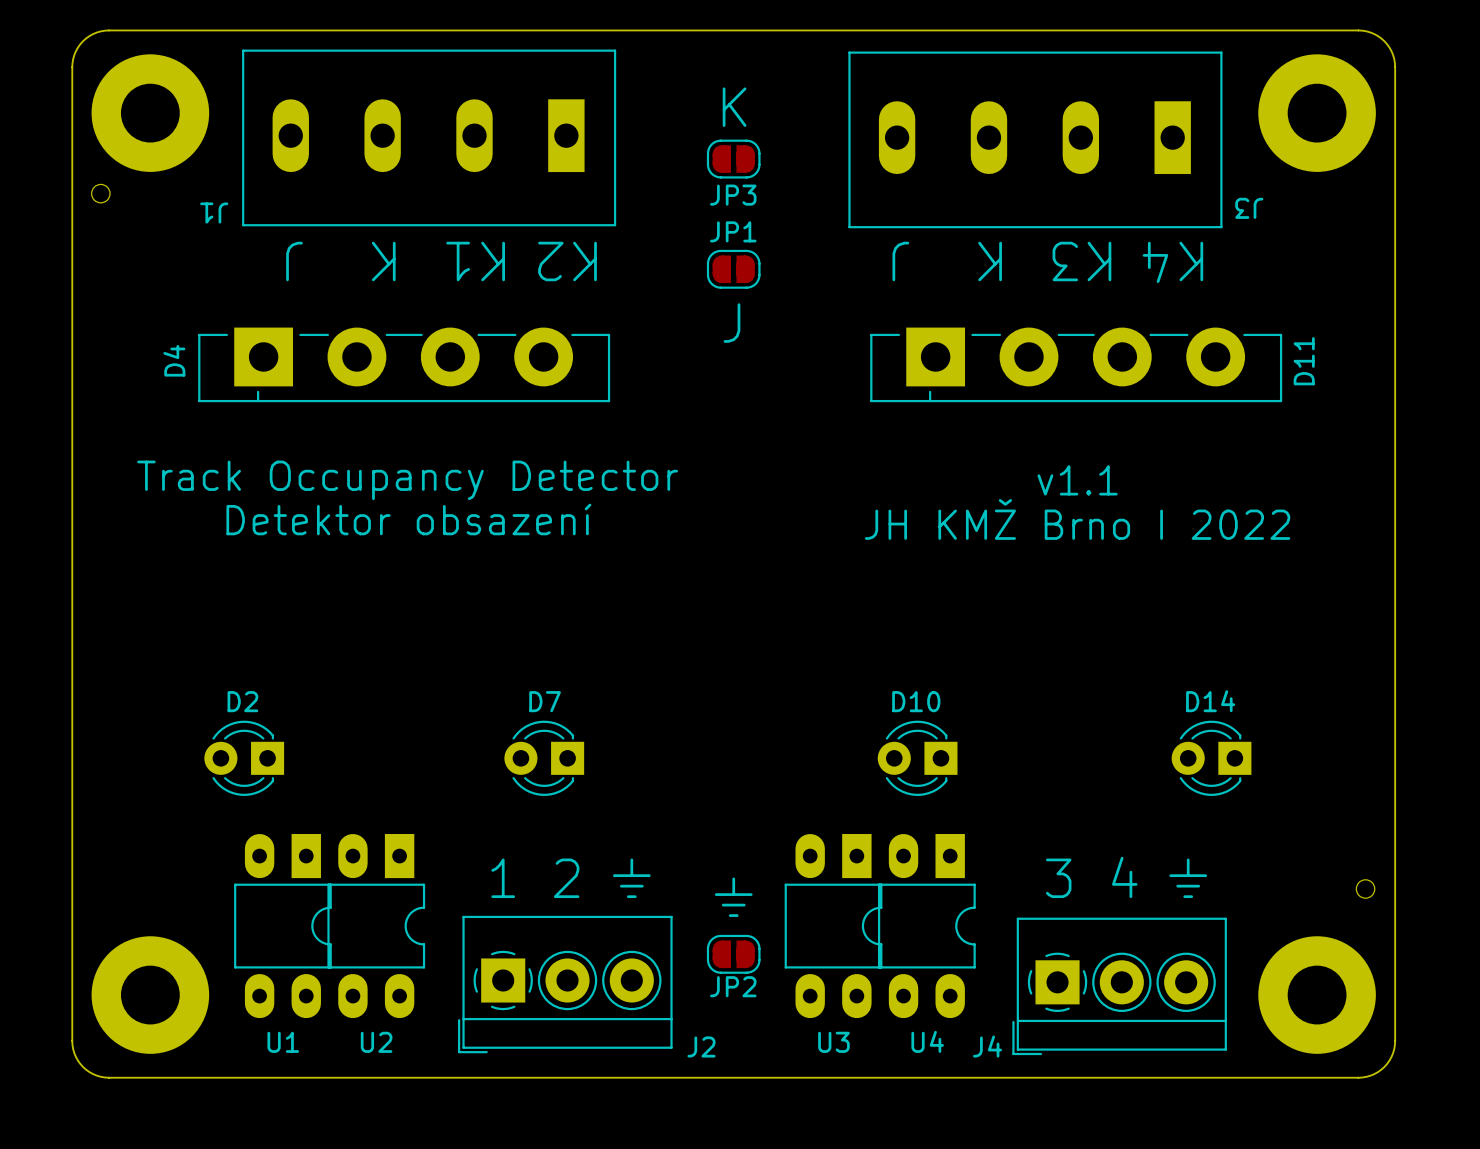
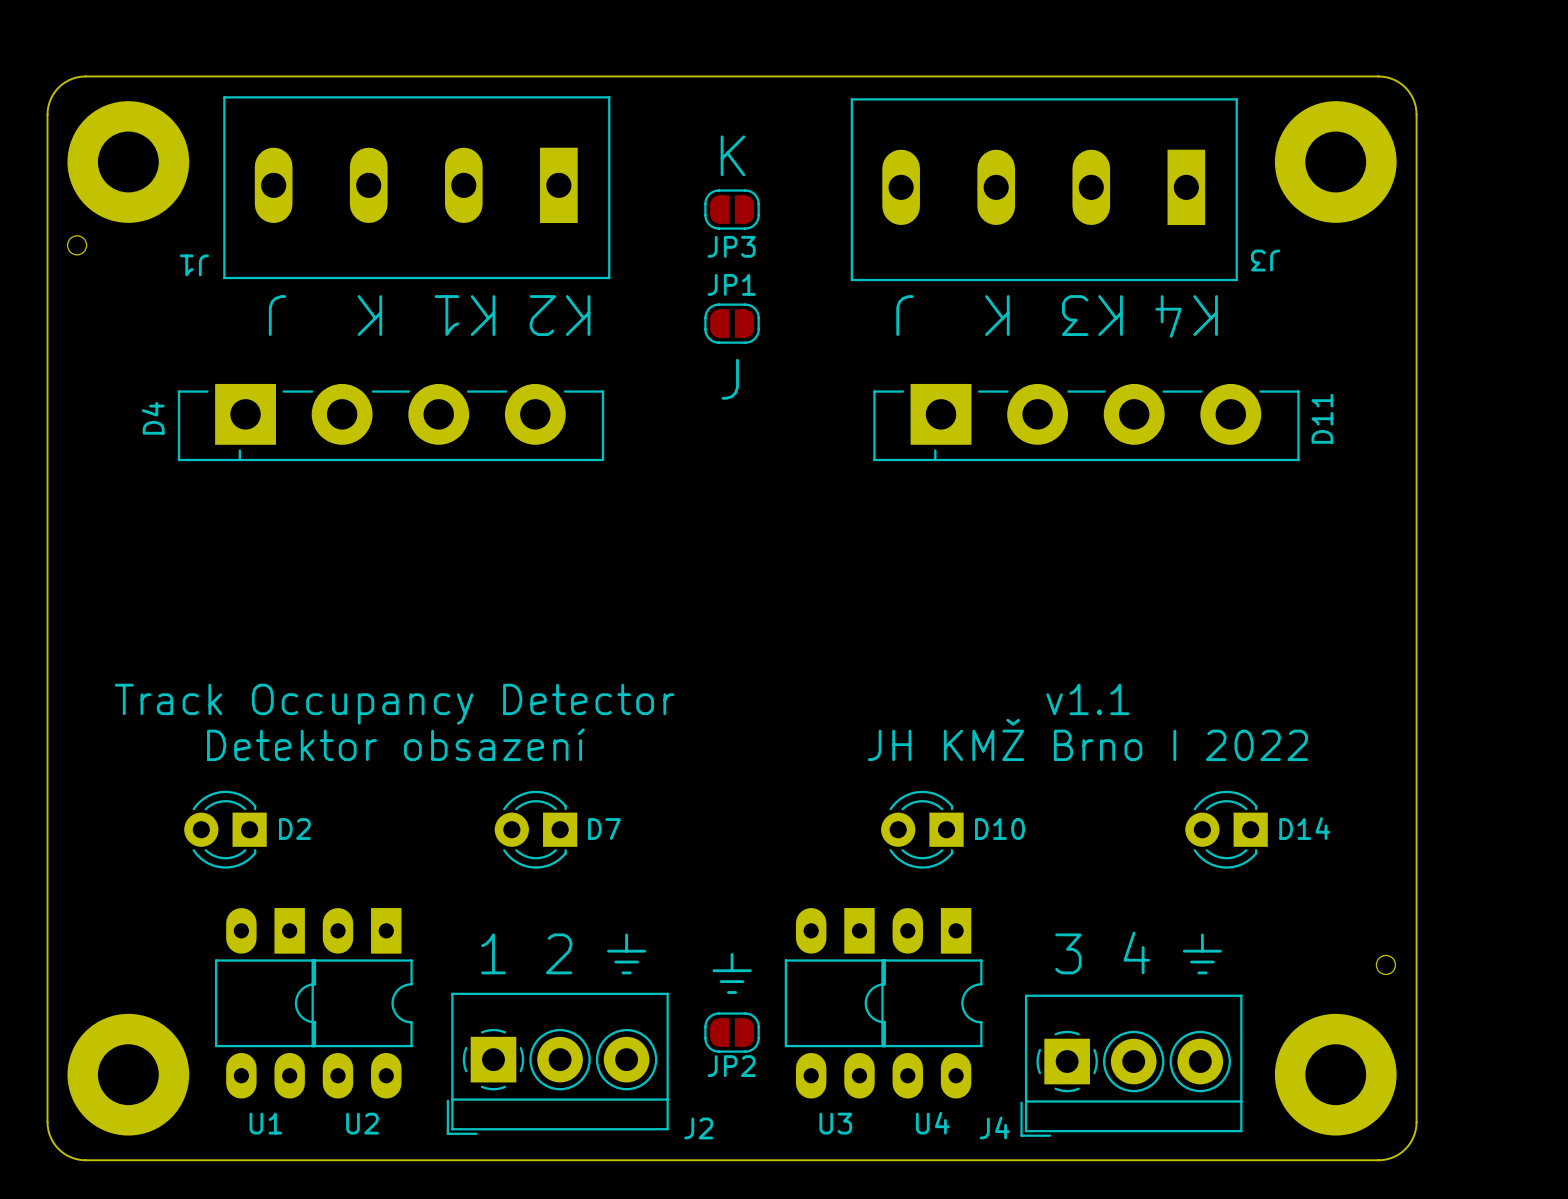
text position: Track Occupancy Detector (407, 480) -> Track Occupancy Detector (394, 704)
text position: v1.1 (1077, 480) -> v1.1 (1087, 699)
text position: Detektor obsazení (408, 519) -> Detektor obsazení (395, 744)
text position: JH KMŽ Brno I 2022 (1077, 519) -> JH KMŽ Brno I 2022 (1087, 739)
D2 name position: D2 (242, 701) -> D2 (294, 829)
D7 name position: D7 (545, 701) -> D7 (604, 829)
D10 name position: D10 (916, 701) -> D10 (999, 829)
D14 name position: D14 (1210, 701) -> D14 (1304, 828)

